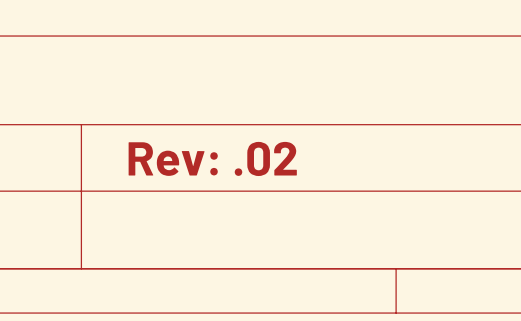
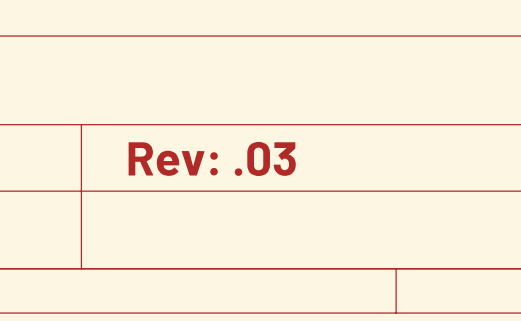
title block: Rev: .02 (212, 158) -> Rev: .03 (212, 158)

